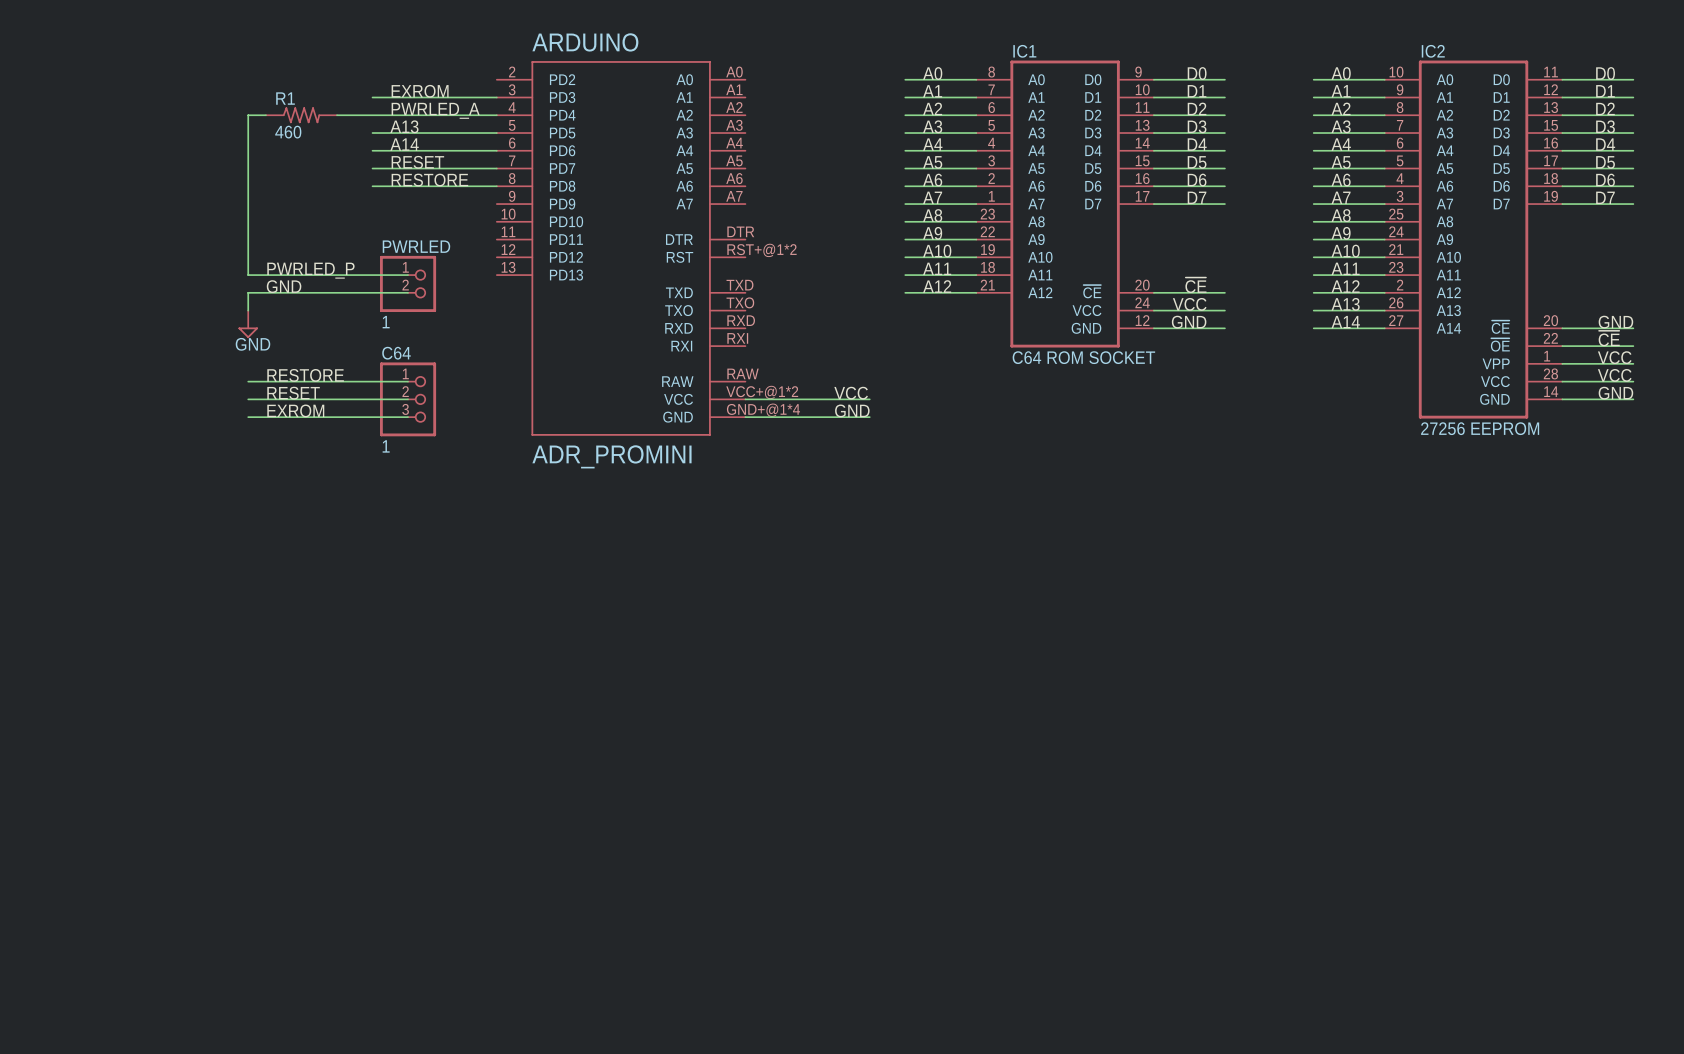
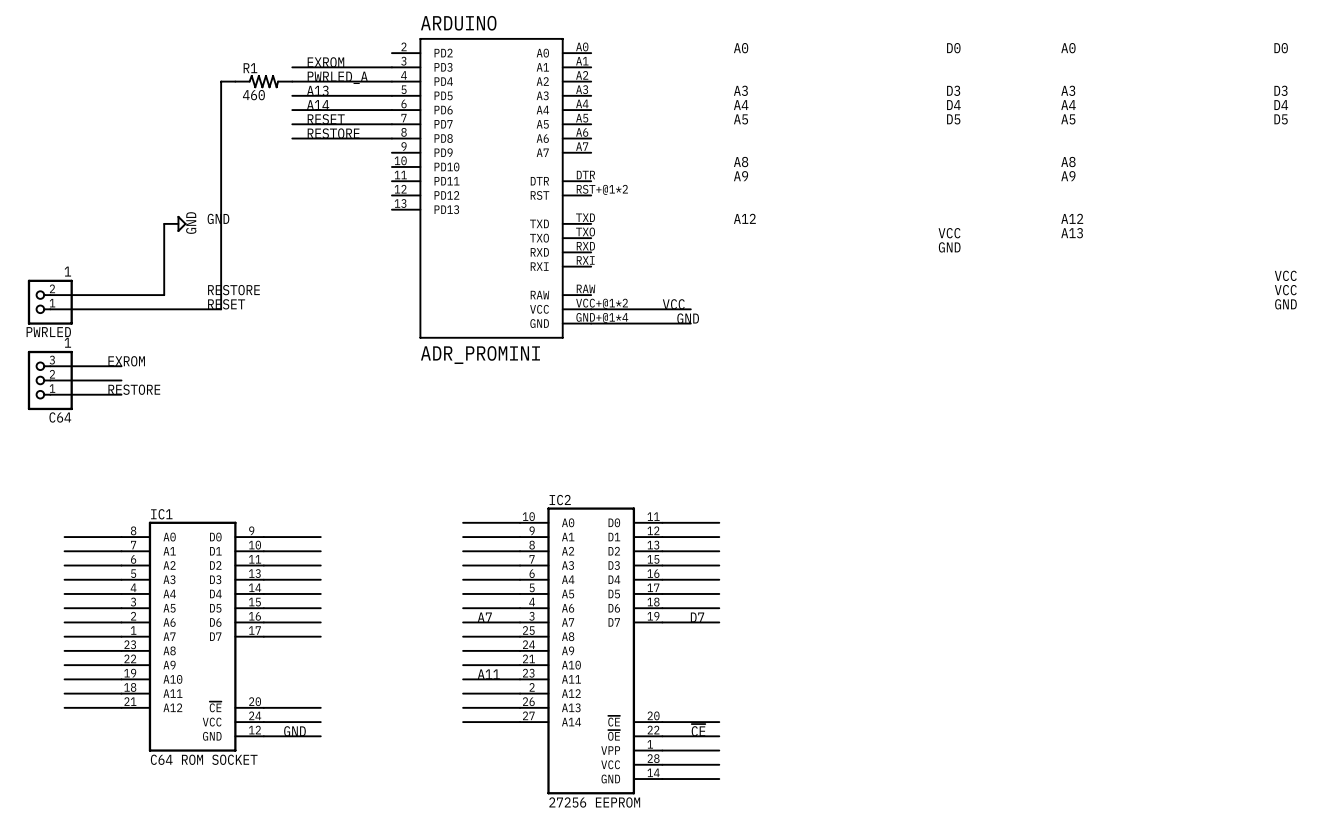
wire: (905, 79) (976, 79) -> none
wire: (1153, 79) (1224, 79) -> none
wire: (1313, 79) (1384, 79) -> none
wire: (1562, 79) (1633, 79) -> none
label: A1 (932, 91) -> none
label: D1 (1197, 91) -> none
label: A1 (1341, 91) -> none
label: D1 (1605, 91) -> none
wire: (905, 97) (976, 97) -> none
wire: (1153, 97) (1224, 97) -> none
wire: (1313, 97) (1384, 97) -> none
wire: (1562, 97) (1633, 97) -> none
label: A2 (932, 108) -> none
label: D2 (1197, 108) -> none
label: A2 (1341, 108) -> none
label: D2 (1605, 108) -> none
wire: (265, 115) (248, 115) (248, 275) (408, 275) -> none
R1 position: (301, 115) -> (263, 81)
wire: (905, 115) (976, 115) -> none
wire: (1153, 115) (1224, 115) -> none
wire: (1313, 115) (1384, 115) -> none
wire: (1562, 115) (1633, 115) -> none
wire: (905, 133) (976, 133) -> none
wire: (1153, 133) (1224, 133) -> none
wire: (1313, 133) (1384, 133) -> none
wire: (1562, 133) (1633, 133) -> none
wire: (905, 150) (976, 150) -> none
wire: (1153, 150) (1224, 150) -> none
wire: (1313, 150) (1384, 150) -> none
wire: (1562, 150) (1633, 150) -> none
wire: (905, 168) (976, 168) -> none
wire: (1153, 168) (1224, 168) -> none
wire: (1313, 168) (1384, 168) -> none
wire: (1562, 168) (1633, 168) -> none
label: A6 (932, 180) -> none
label: D6 (1197, 180) -> none
label: A6 (1341, 180) -> none
label: D6 (1605, 180) -> none
wire: (905, 186) (976, 186) -> none
wire: (1153, 186) (1224, 186) -> none
wire: (1313, 186) (1384, 186) -> none
wire: (1562, 186) (1633, 186) -> none
label: A7 (932, 197) -> none
label: D7 (1197, 197) -> none
label: A7 (1341, 197) -> none
label: D7 (1605, 197) -> none
wire: (905, 204) (976, 204) -> none
IC1 position: (1065, 204) -> (192, 636)
wire: (1153, 204) (1224, 204) -> none
wire: (1313, 204) (1384, 204) -> none
wire: (1562, 204) (1633, 204) -> none
wire: (905, 221) (976, 221) -> none
wire: (1313, 221) (1384, 221) -> none
wire: (905, 239) (976, 239) -> none
wire: (1313, 239) (1384, 239) -> none
IC2 position: (1473, 239) -> (591, 650)
label: A10 (937, 251) -> none
label: A10 (1345, 251) -> none
wire: (905, 257) (976, 257) -> none
wire: (1313, 257) (1384, 257) -> none
label: A11 (937, 268) -> none
label: A11 (1345, 268) -> none
label: PWRLED_P (310, 270) -> none
wire: (905, 275) (976, 275) -> none
wire: (1313, 275) (1384, 275) -> none
PWRLED: 1 (408, 283) -> none
label: ~{CE} (1195, 285) -> none
wire: none -> (164, 223) (164, 295) (50, 295)
wire: (408, 292) (248, 292) (248, 310) -> none
wire: (905, 292) (976, 292) -> none
wire: (1153, 292) (1224, 292) -> none
wire: (1313, 292) (1384, 292) -> none
wire: (1153, 310) (1224, 310) -> none
wire: (1313, 310) (1384, 310) -> none
label: A14 (1345, 322) -> none
label: GND (1615, 322) -> none
power symbol position: GND (248, 324) -> GND (175, 223)
wire: (1153, 328) (1224, 328) -> none
wire: (1313, 328) (1384, 328) -> none
wire: (1562, 328) (1633, 328) -> none
power symbol rotation: 0° (248, 332) -> 90° counterclockwise (181, 223)
label: ~{CE} (1609, 338) -> none
wire: (1562, 346) (1633, 346) -> none
wire: (1562, 363) (1633, 363) -> none
wire: (248, 381) (408, 381) -> none
wire: (1562, 381) (1633, 381) -> none
PWRLED: none -> 1 (50, 302)
wire: none -> (50, 309) (192, 309)
wire: (283, 399) (408, 399) -> (221, 309) (221, 81) (235, 81)
C64 rotation: 0° (408, 399) -> 180° (50, 380)
C64 position: (408, 399) -> (50, 380)
wire: (1562, 399) (1633, 399) -> none
label position: EXROM (295, 410) -> EXROM (126, 361)
label position: GND (852, 410) -> GND (688, 318)
wire: (248, 417) (408, 417) -> none
wire: none -> (50, 366) (121, 366)
wire: none -> (50, 380) (121, 380)
label: none -> RESTORE (134, 389)
wire: none -> (50, 394) (121, 394)
wire: none -> (463, 522) (520, 522)
wire: none -> (662, 522) (719, 522)
wire: none -> (64, 537) (121, 537)
wire: none -> (263, 537) (320, 537)
wire: none -> (463, 537) (520, 537)
wire: none -> (662, 537) (719, 537)
wire: none -> (64, 551) (121, 551)
wire: none -> (263, 551) (320, 551)
wire: none -> (463, 551) (520, 551)
wire: none -> (662, 551) (719, 551)
wire: none -> (64, 565) (121, 565)
wire: none -> (263, 565) (320, 565)
wire: none -> (463, 565) (520, 565)
wire: none -> (662, 565) (719, 565)
wire: none -> (64, 579) (121, 579)
wire: none -> (263, 579) (320, 579)
wire: none -> (463, 579) (520, 579)
wire: none -> (662, 579) (719, 579)
wire: none -> (64, 593) (121, 593)
wire: none -> (263, 593) (320, 593)
wire: none -> (463, 593) (520, 593)
wire: none -> (662, 593) (719, 593)
wire: none -> (64, 608) (121, 608)
wire: none -> (263, 608) (320, 608)
wire: none -> (463, 608) (520, 608)
wire: none -> (662, 608) (719, 608)
label: none -> A7 (484, 617)
label: none -> D7 (697, 617)
wire: none -> (64, 622) (121, 622)
wire: none -> (263, 622) (320, 622)
wire: none -> (463, 622) (520, 622)
wire: none -> (662, 622) (719, 622)
wire: none -> (64, 636) (121, 636)
wire: none -> (263, 636) (320, 636)
wire: none -> (463, 636) (520, 636)
wire: none -> (64, 650) (121, 650)
wire: none -> (463, 650) (520, 650)
wire: none -> (64, 665) (121, 665)
wire: none -> (463, 665) (520, 665)
label: none -> A11 (488, 674)
wire: none -> (64, 679) (121, 679)
wire: none -> (463, 679) (520, 679)
wire: none -> (64, 693) (121, 693)
wire: none -> (463, 693) (520, 693)
wire: none -> (64, 707) (121, 707)
wire: none -> (263, 707) (320, 707)
wire: none -> (463, 707) (520, 707)
wire: none -> (263, 722) (320, 722)
wire: none -> (463, 722) (520, 722)
wire: none -> (662, 722) (719, 722)
label: none -> ~{CE} (698, 730)
label: none -> GND (294, 731)
wire: none -> (263, 736) (320, 736)
wire: none -> (662, 736) (719, 736)
wire: none -> (662, 750) (719, 750)
wire: none -> (662, 764) (719, 764)
wire: none -> (662, 779) (719, 779)

